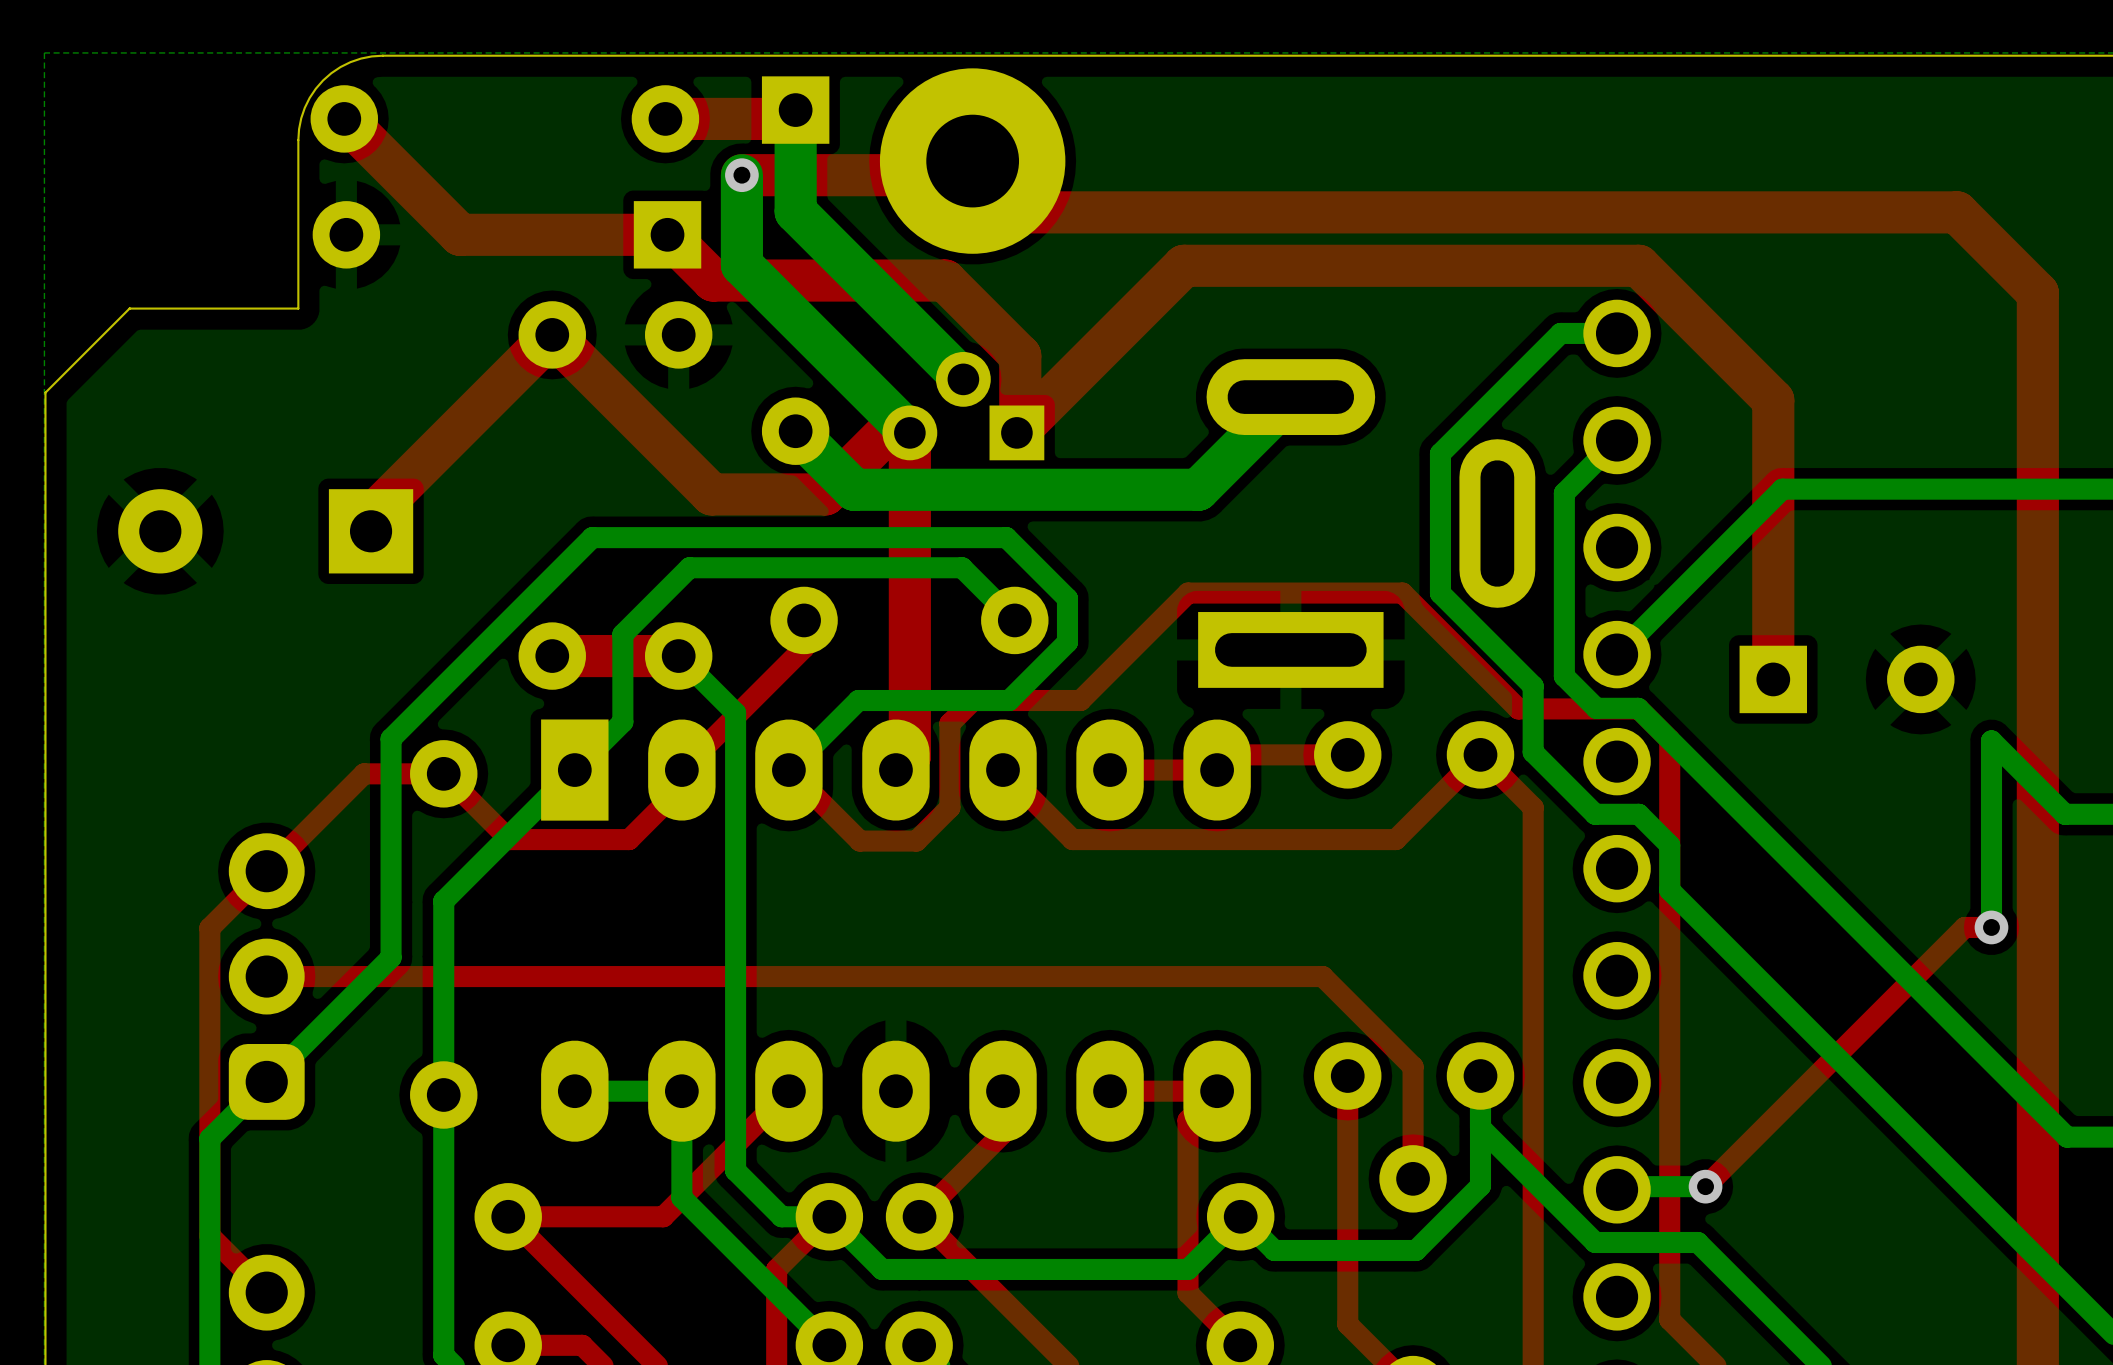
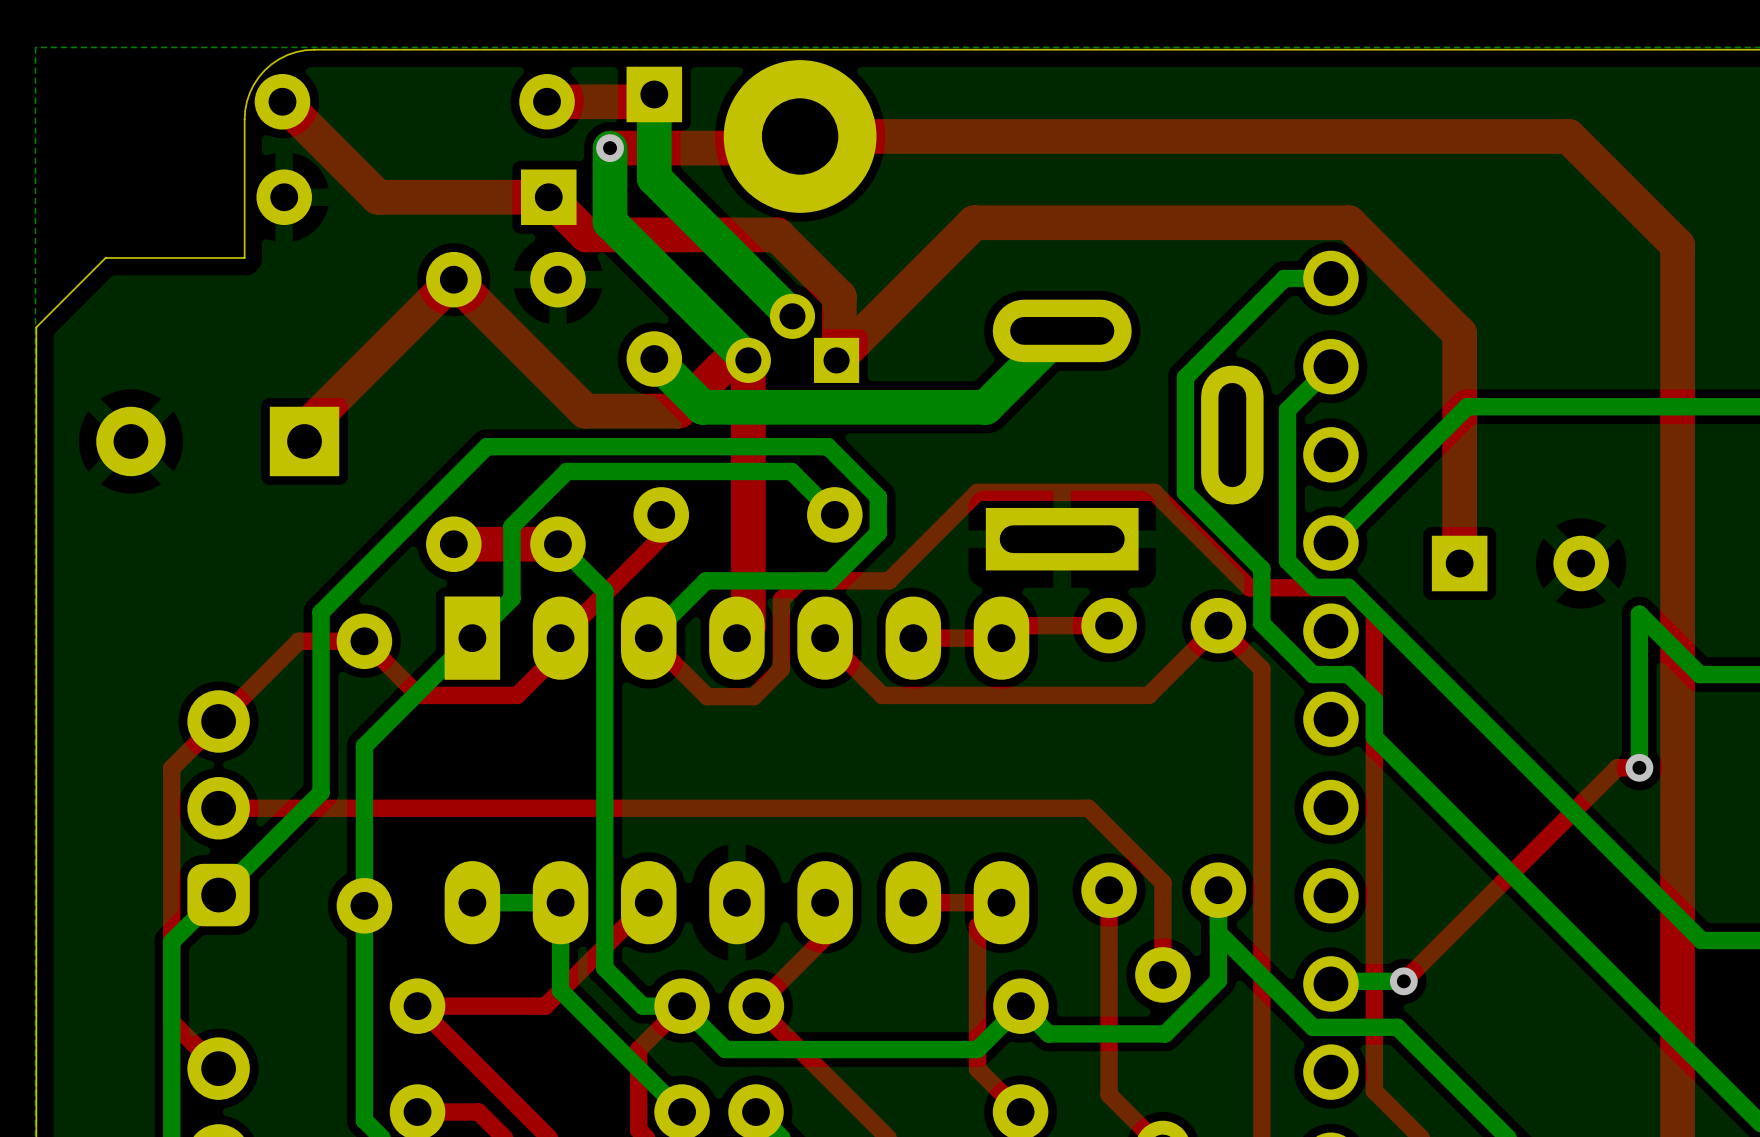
top track: (972, 161) (1023, 212) (1957, 212) -> (800, 136) (1568, 136) (1611, 178)

